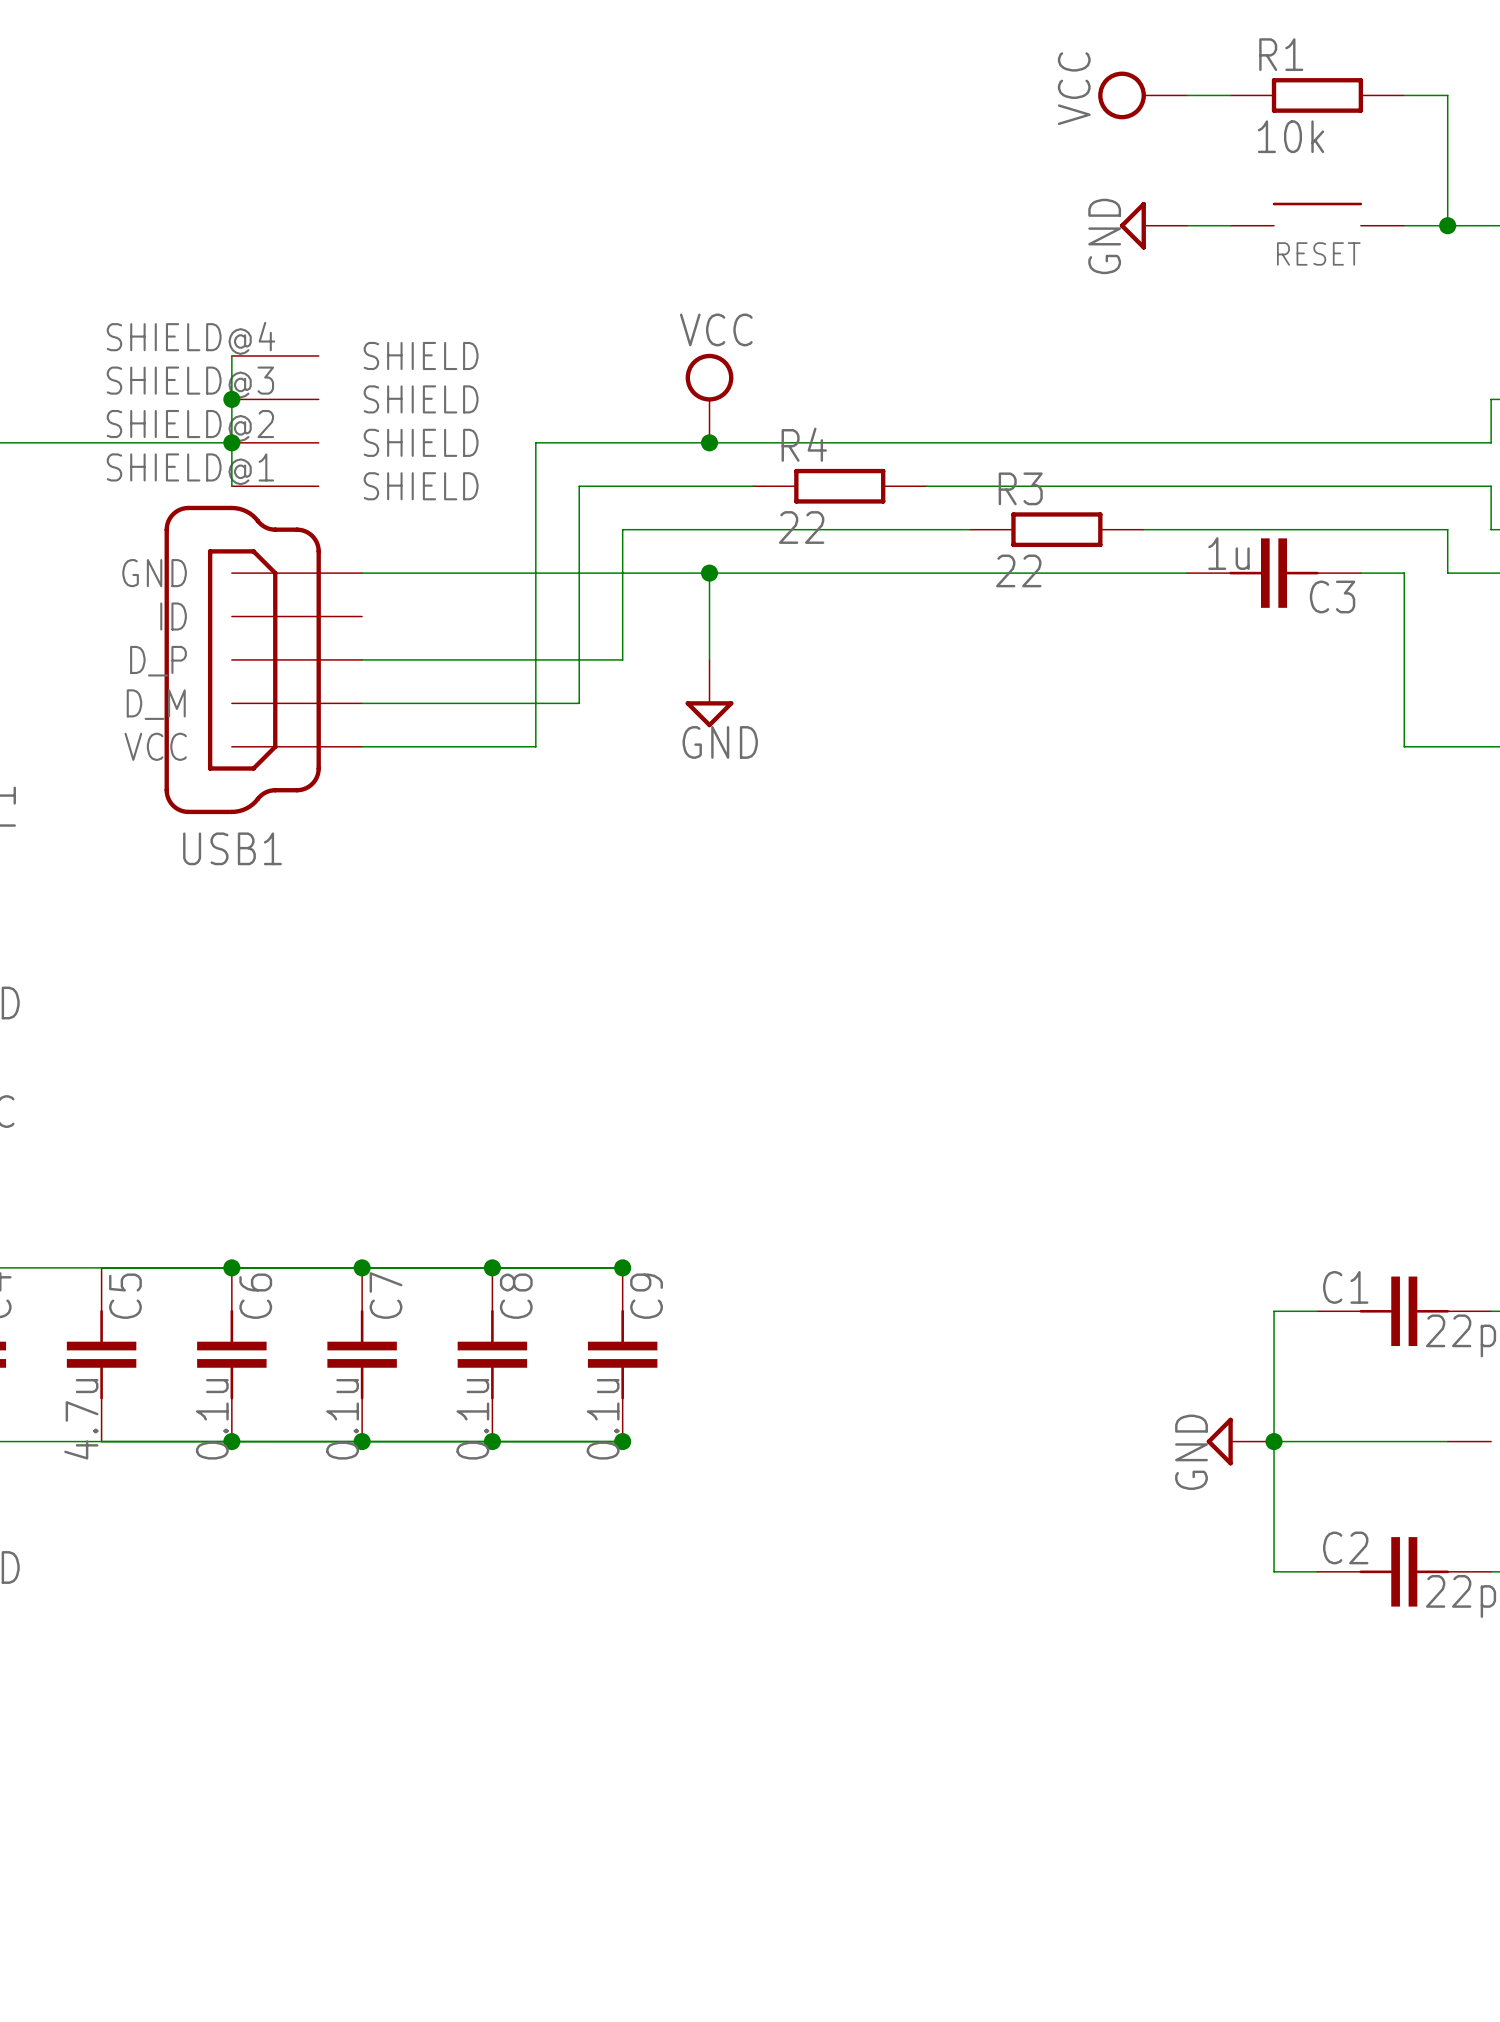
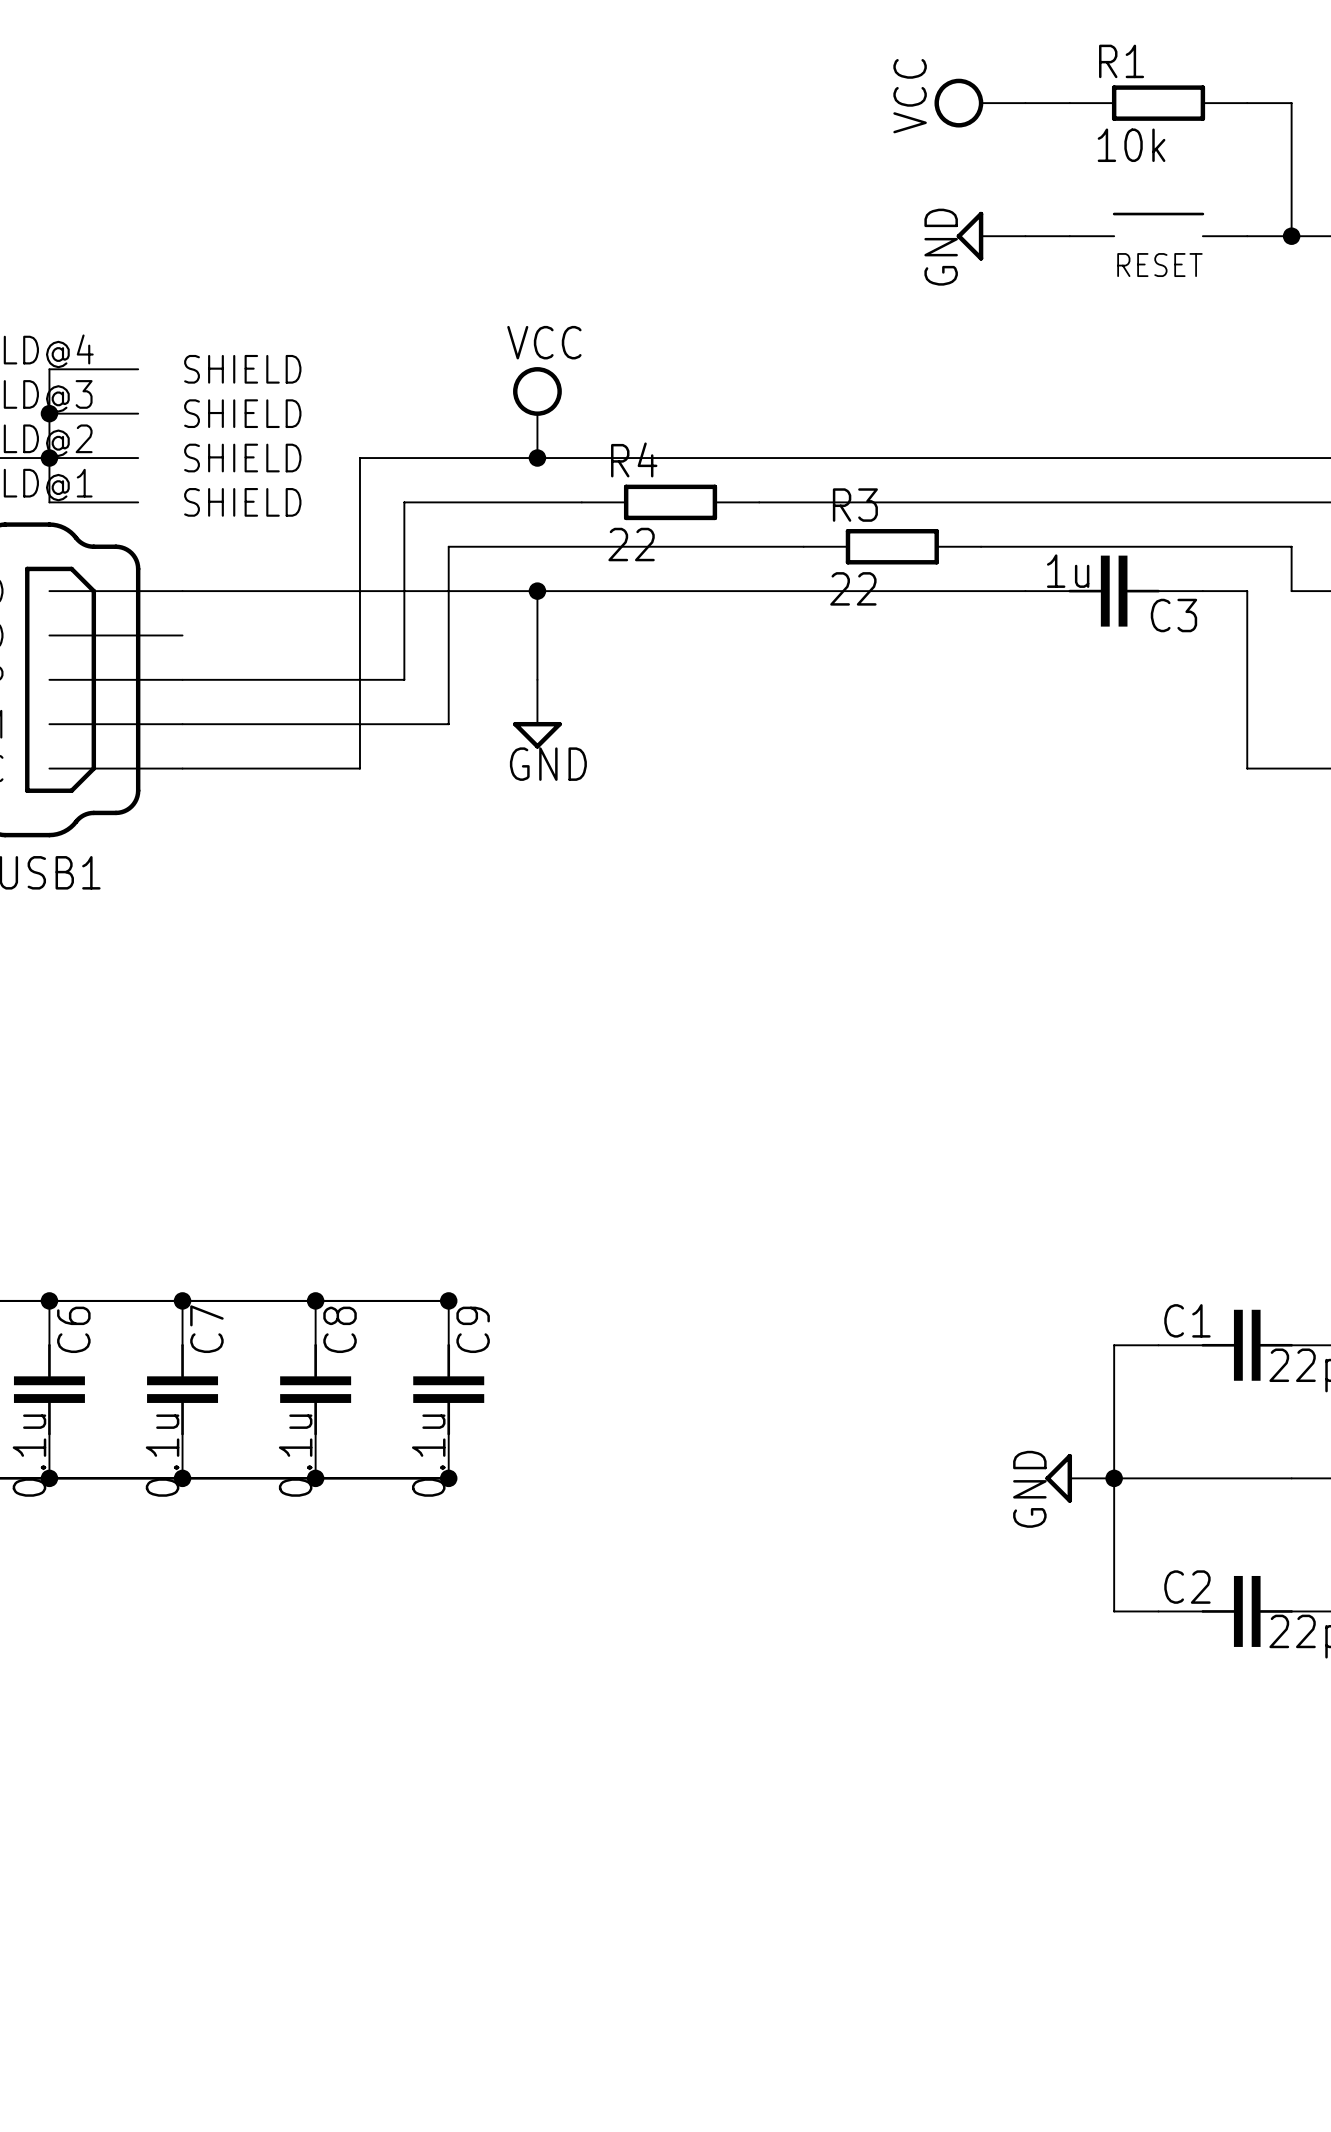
wire: (622, 659) (579, 659) (579, 703) -> (448, 679) (448, 724) (404, 724)

